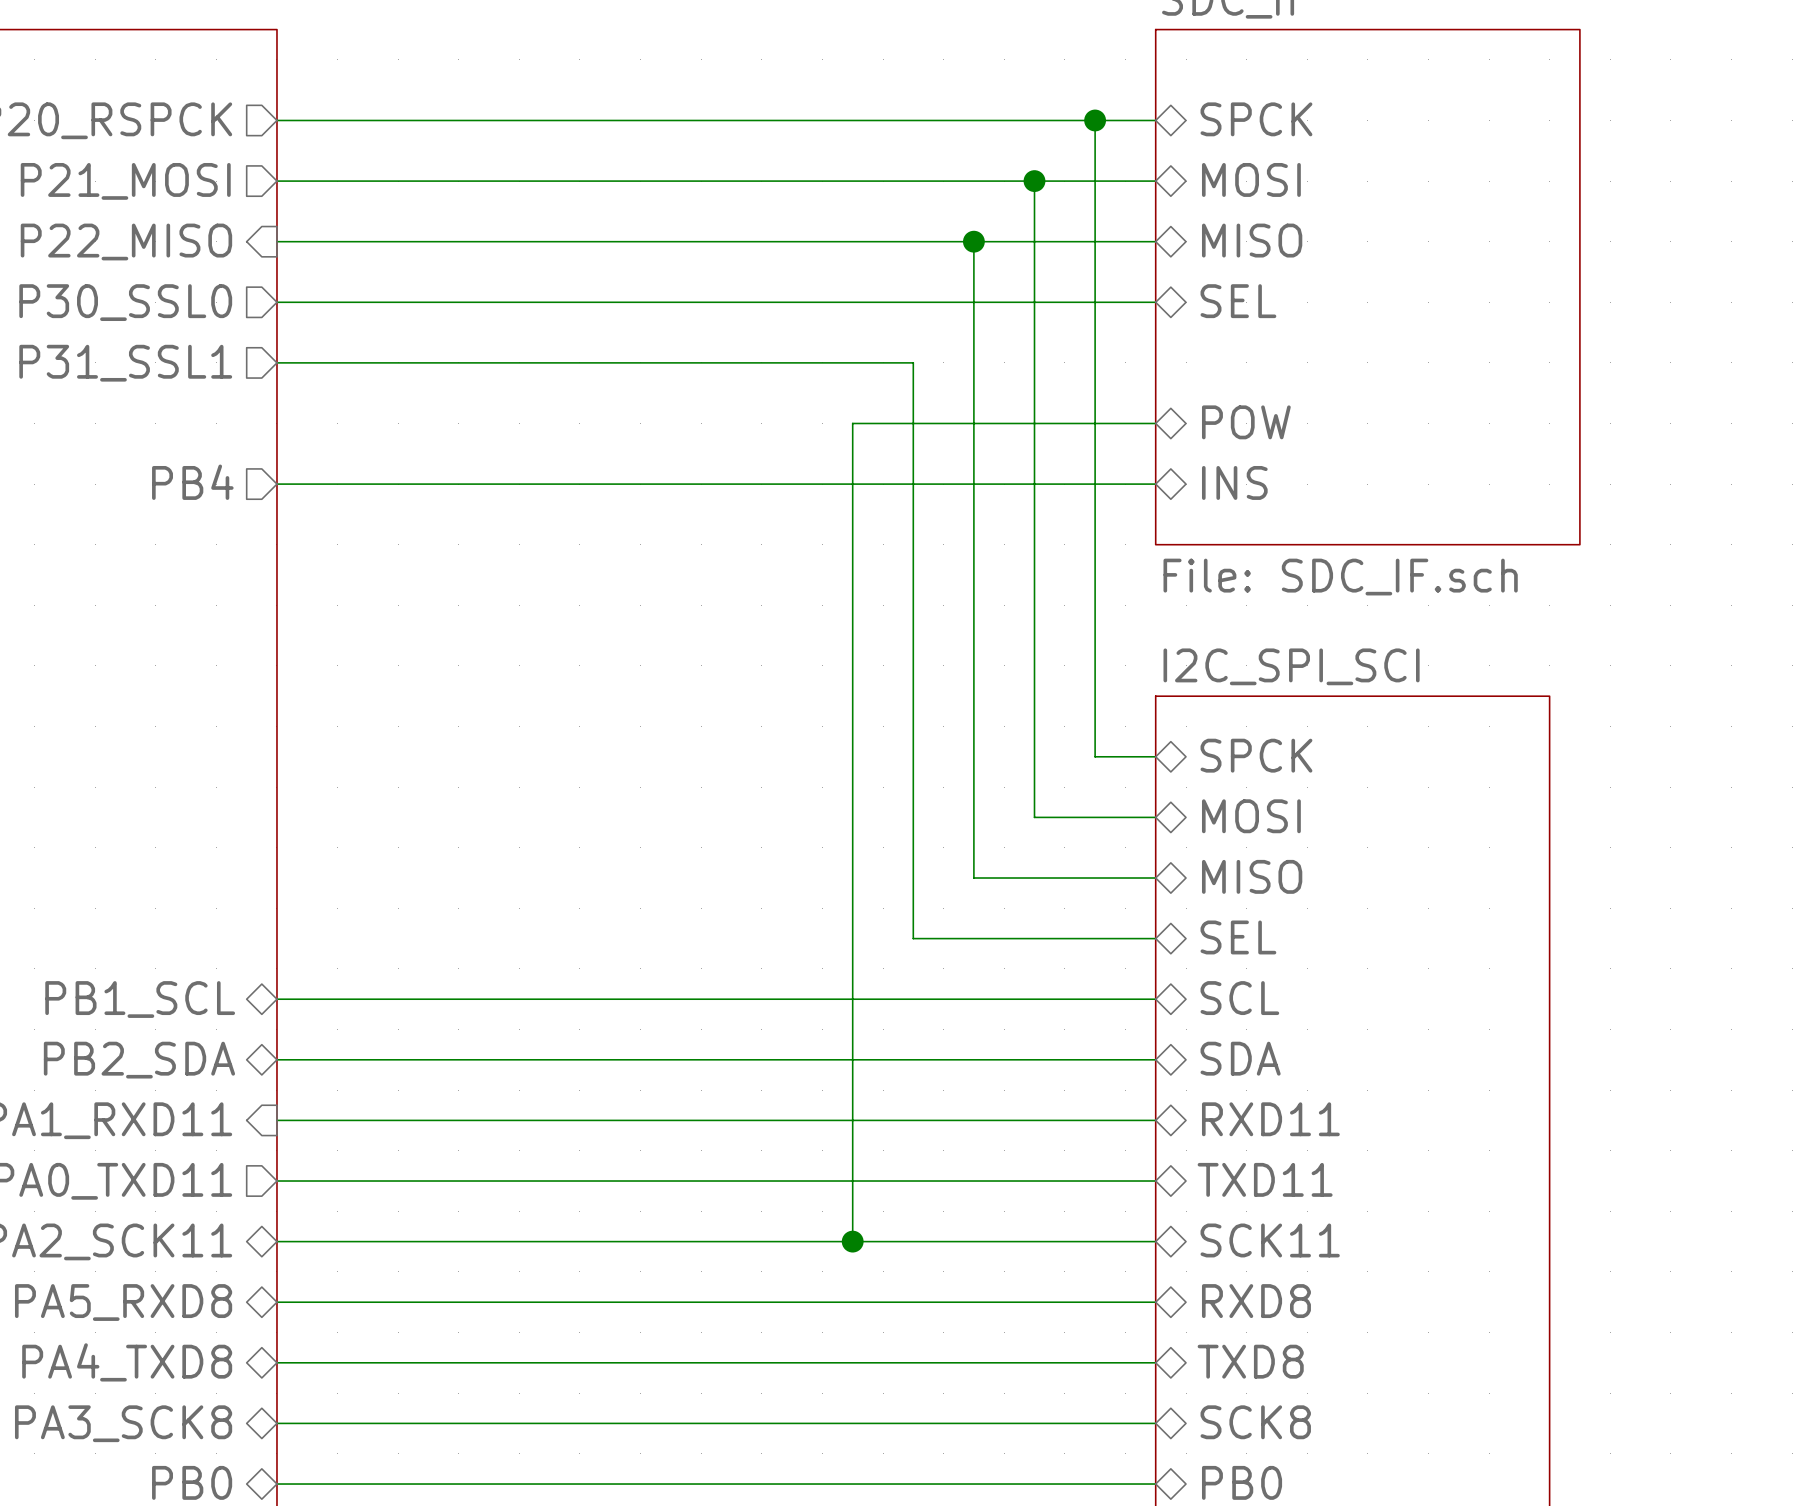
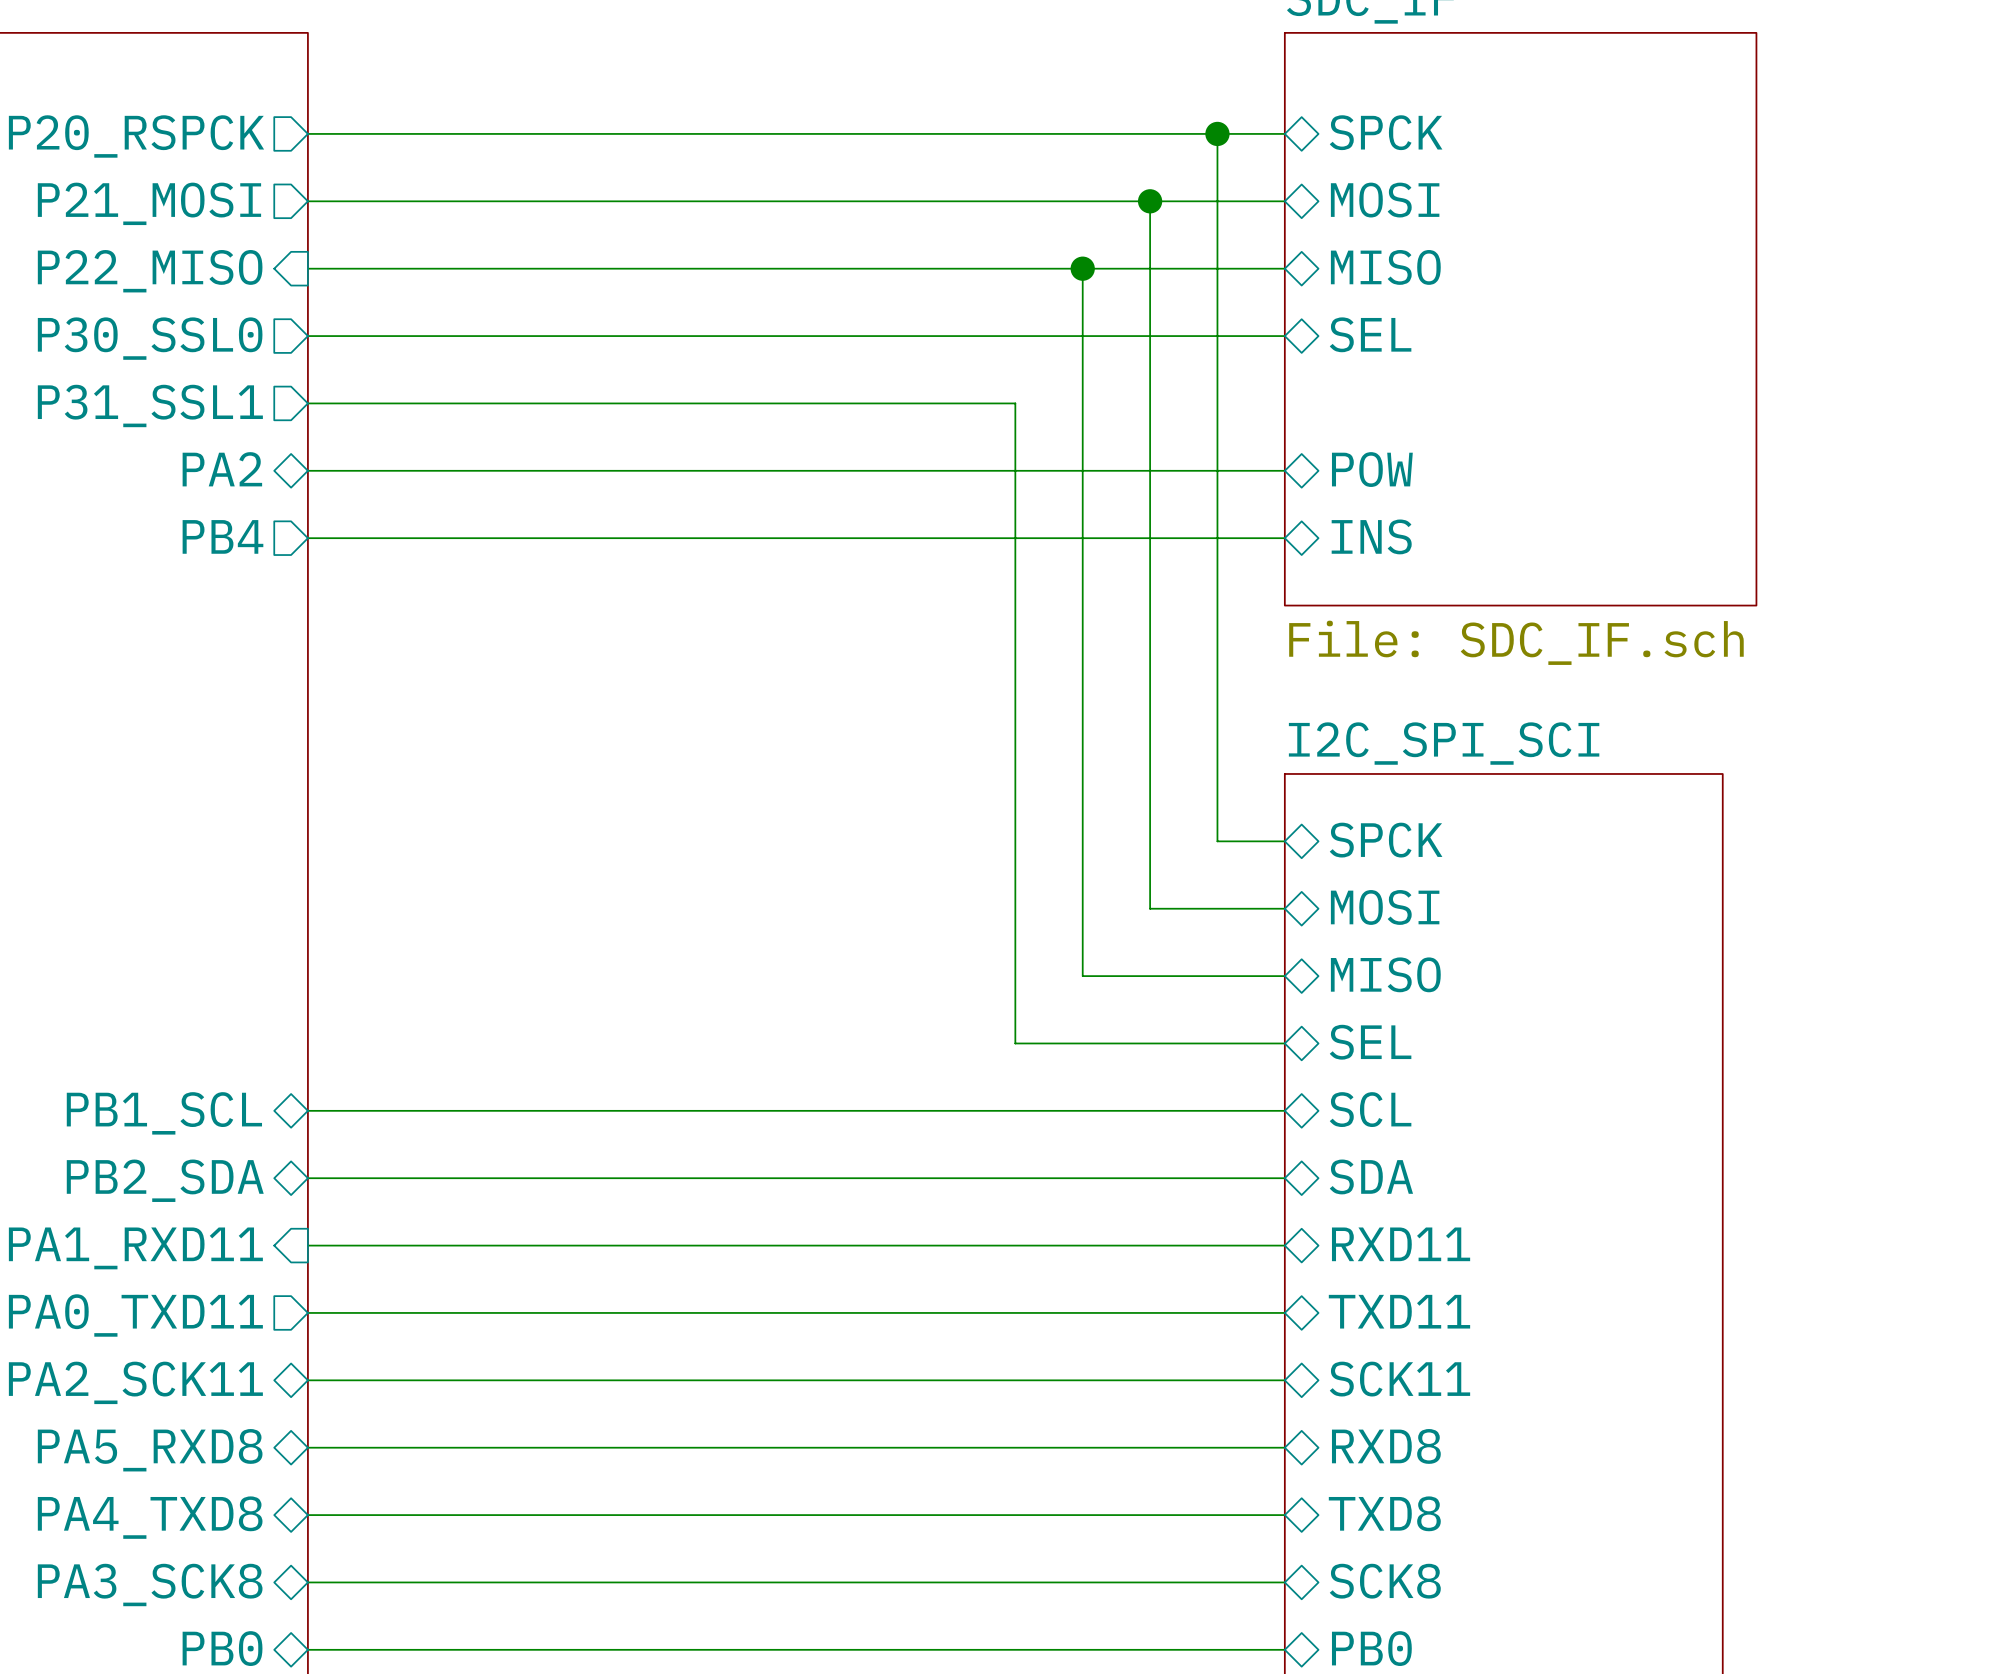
sheet pin: none -> PA2 (222, 469)
wire: (852, 423) (852, 1241) -> (947, 470) (307, 470)
junction: (852, 1241) -> none

